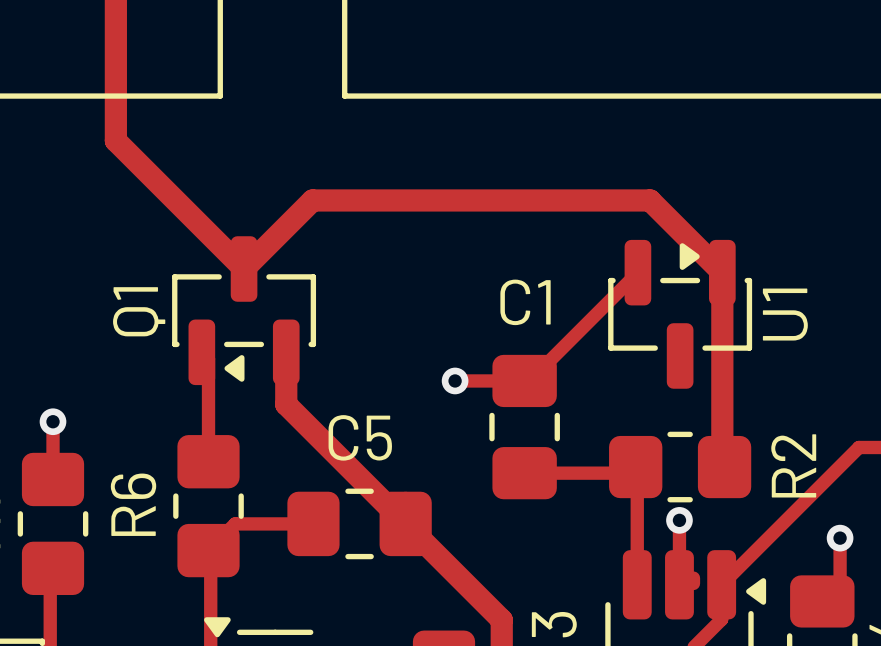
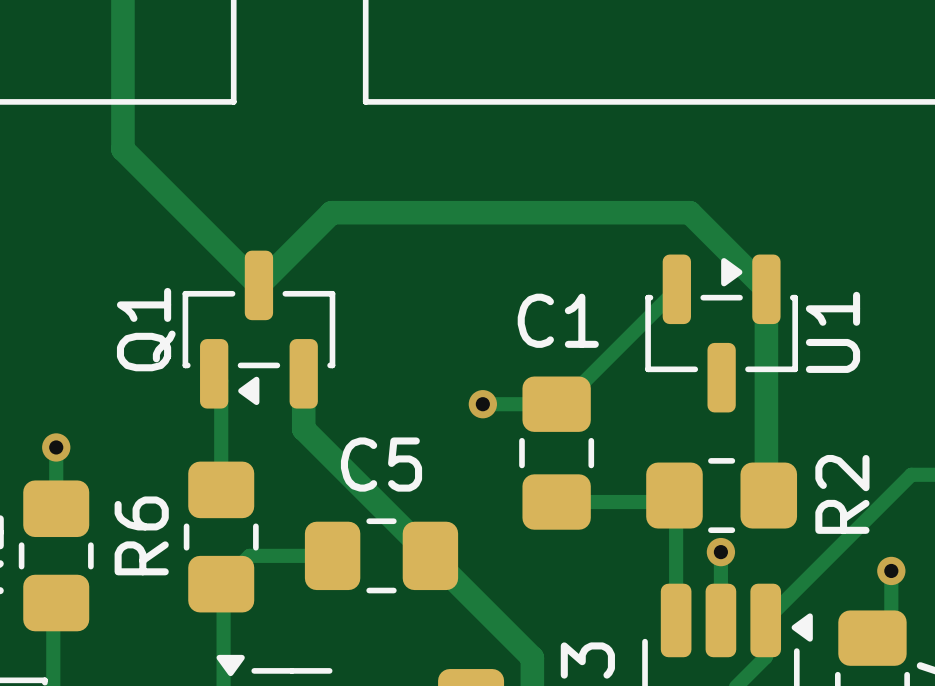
track: (693, 578) (693, 583) -> none

